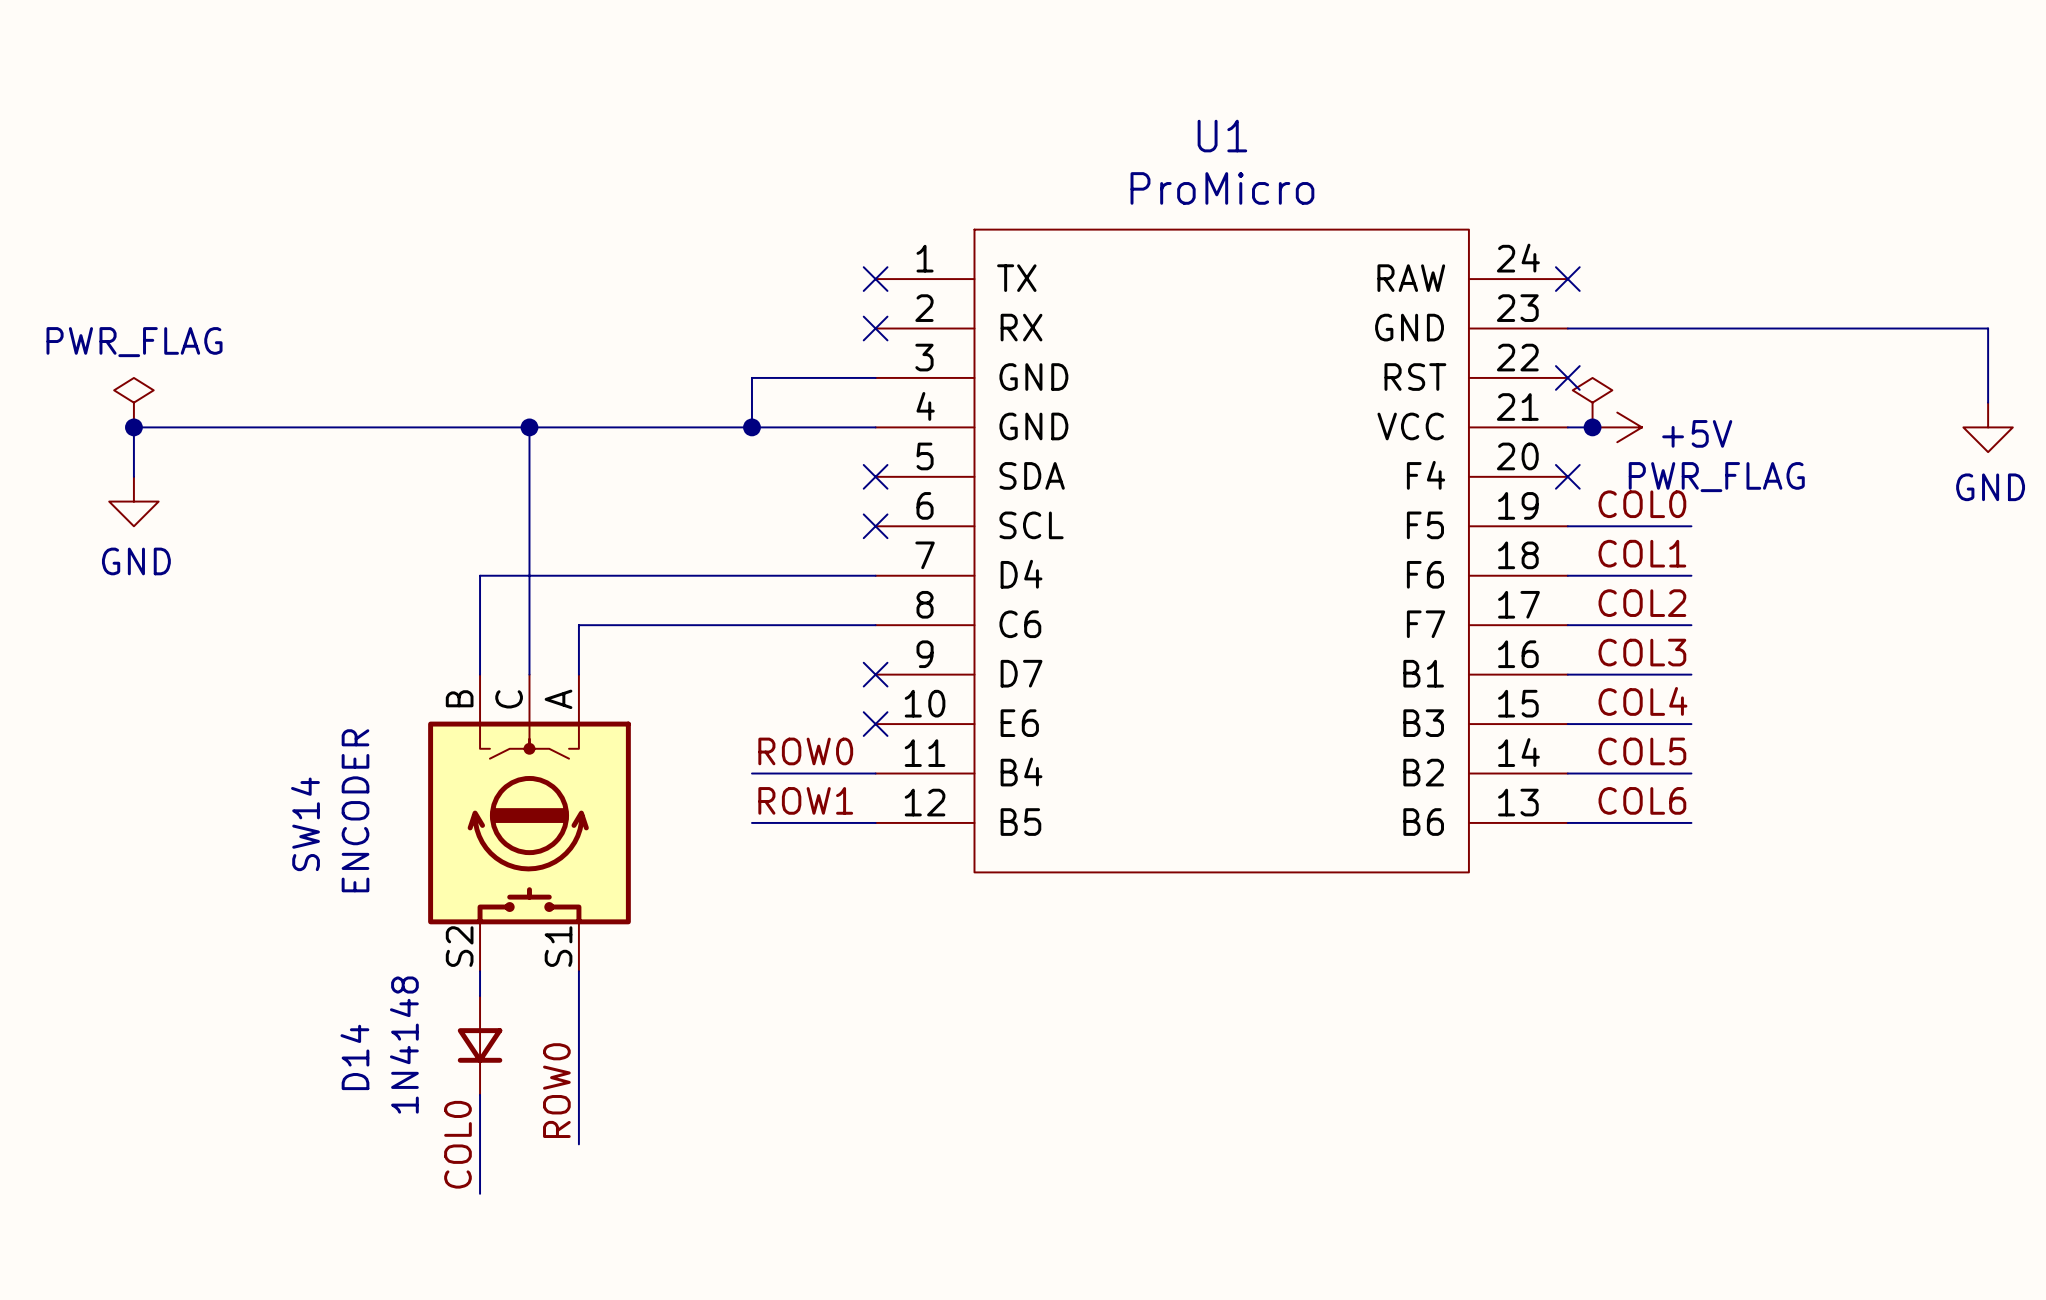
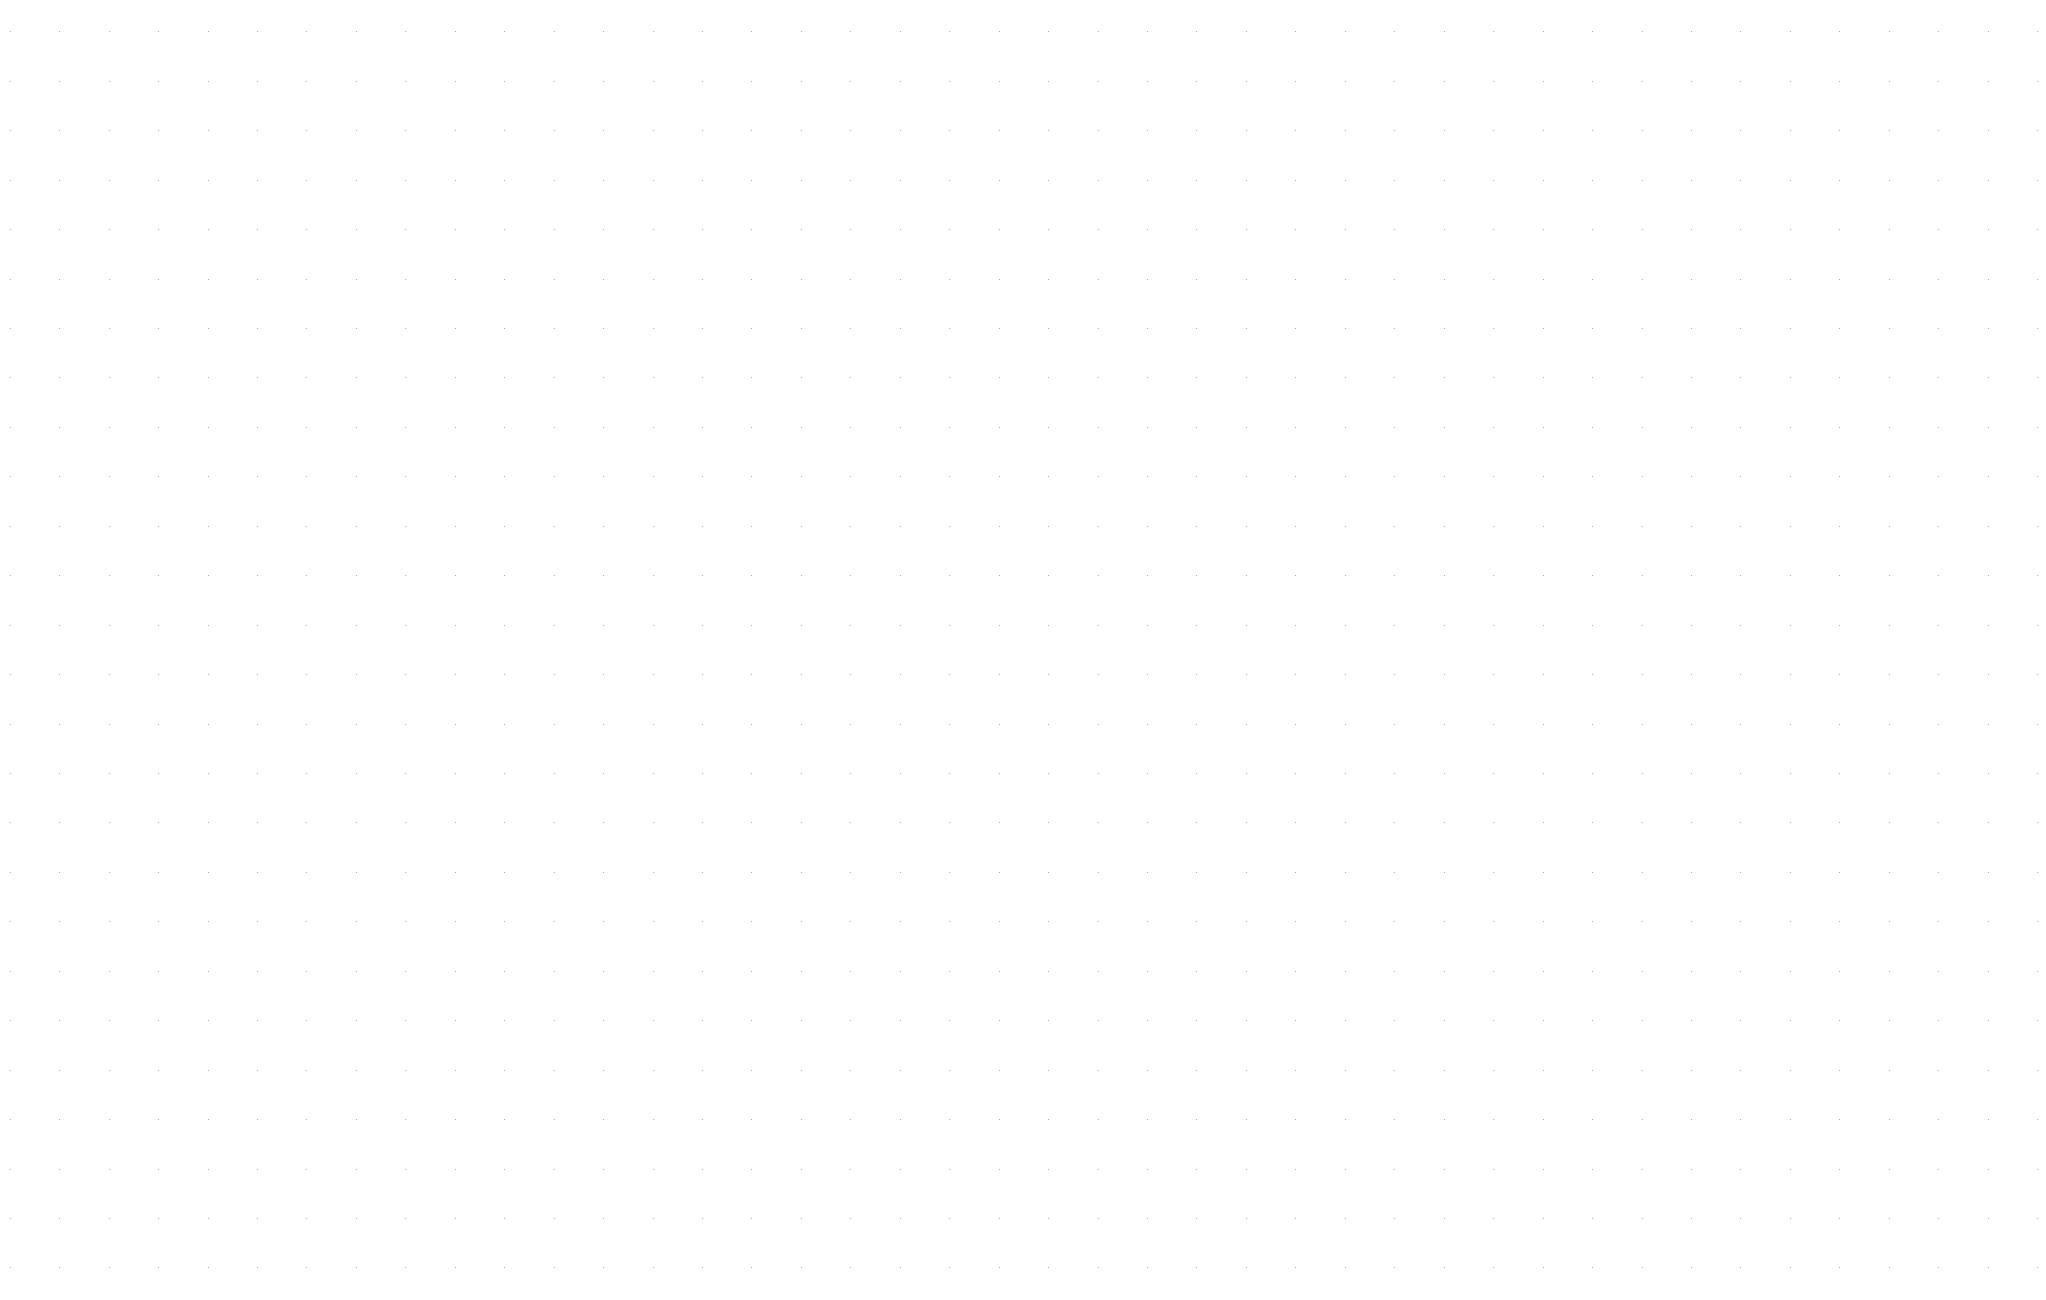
no-connect mark: (875, 279) -> none
no-connect mark: (1567, 279) -> none
no-connect mark: (875, 328) -> none
wire: (1567, 328) (1988, 328) (1988, 402) -> none
wire: (875, 377) (751, 377) (751, 427) -> none
no-connect mark: (1567, 377) -> none
power symbol: PWR_FLAG (133, 402) -> none
power symbol: PWR_FLAG (1592, 402) -> none
junction: (133, 427) -> none
wire: (529, 427) (529, 674) -> none
junction: (529, 427) -> none
junction: (751, 427) -> none
wire: (875, 427) (133, 427) (133, 476) -> none
wire: (1567, 427) (1592, 427) -> none
junction: (1592, 427) -> none
power symbol: +5V (1617, 427) -> none
power symbol: GND (1988, 427) -> none
no-connect mark: (875, 476) -> none
no-connect mark: (1567, 476) -> none
power symbol: GND (133, 501) -> none
label: COL0 (1642, 504) -> none
no-connect mark: (875, 526) -> none
wire: (1567, 526) (1691, 526) -> none
U1: ProMicro (1221, 551) -> none
label: COL1 (1642, 553) -> none
wire: (875, 575) (480, 575) (480, 674) -> none
wire: (1567, 575) (1691, 575) -> none
label: COL2 (1642, 603) -> none
wire: (875, 625) (578, 625) (578, 674) -> none
wire: (1567, 625) (1691, 625) -> none
label: COL3 (1642, 652) -> none
no-connect mark: (875, 674) -> none
wire: (1567, 674) (1691, 674) -> none
label: COL4 (1642, 701) -> none
no-connect mark: (875, 724) -> none
wire: (1567, 724) (1691, 724) -> none
label: ROW0 (805, 751) -> none
label: COL5 (1642, 751) -> none
wire: (751, 773) (875, 773) -> none
wire: (1567, 773) (1691, 773) -> none
label: ROW1 (805, 800) -> none
label: COL6 (1642, 800) -> none
SW14: ENCODER (529, 822) -> none
wire: (751, 822) (875, 822) -> none
wire: (1567, 822) (1691, 822) -> none
wire: (480, 971) (480, 996) -> none
wire: (578, 971) (578, 1144) -> none
D14: 1N4148 (480, 1045) -> none
label: ROW0 (556, 1090) -> none
wire: (480, 1094) (480, 1193) -> none
label: COL0 (457, 1144) -> none

